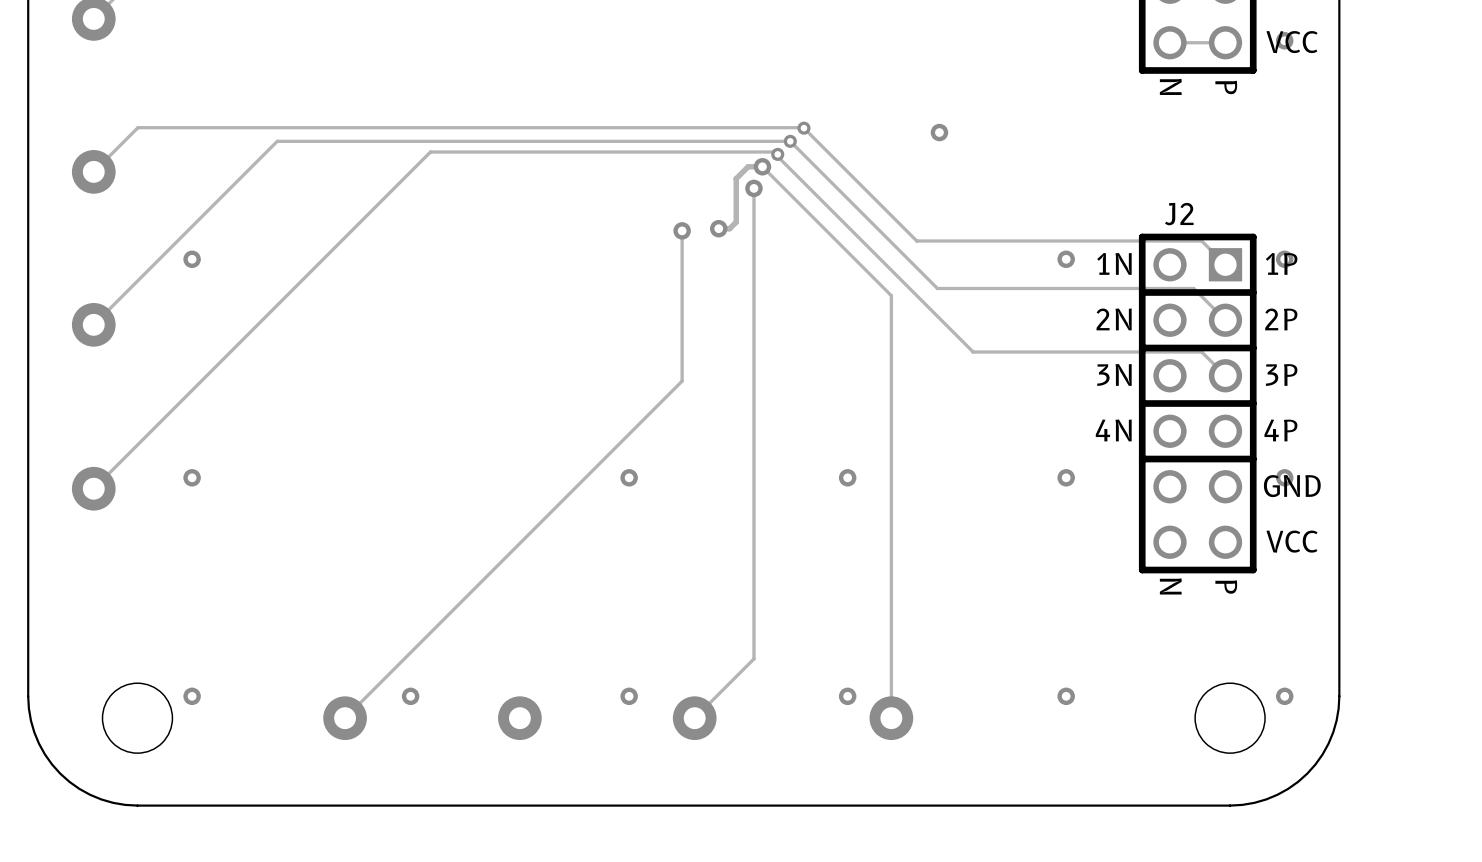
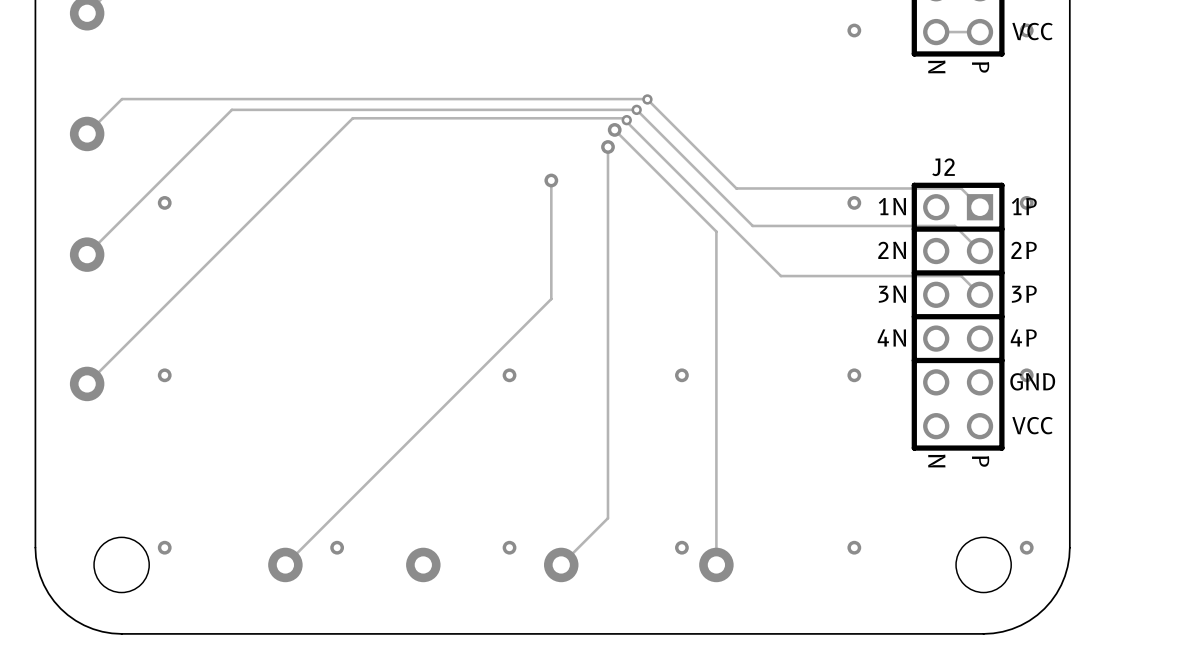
via: none -> (854, 30)
via: (939, 132) -> none
track: (762, 166) (748, 166) (736, 178) (736, 222) (729, 228) (718, 228) -> none
via: (718, 228) -> none

